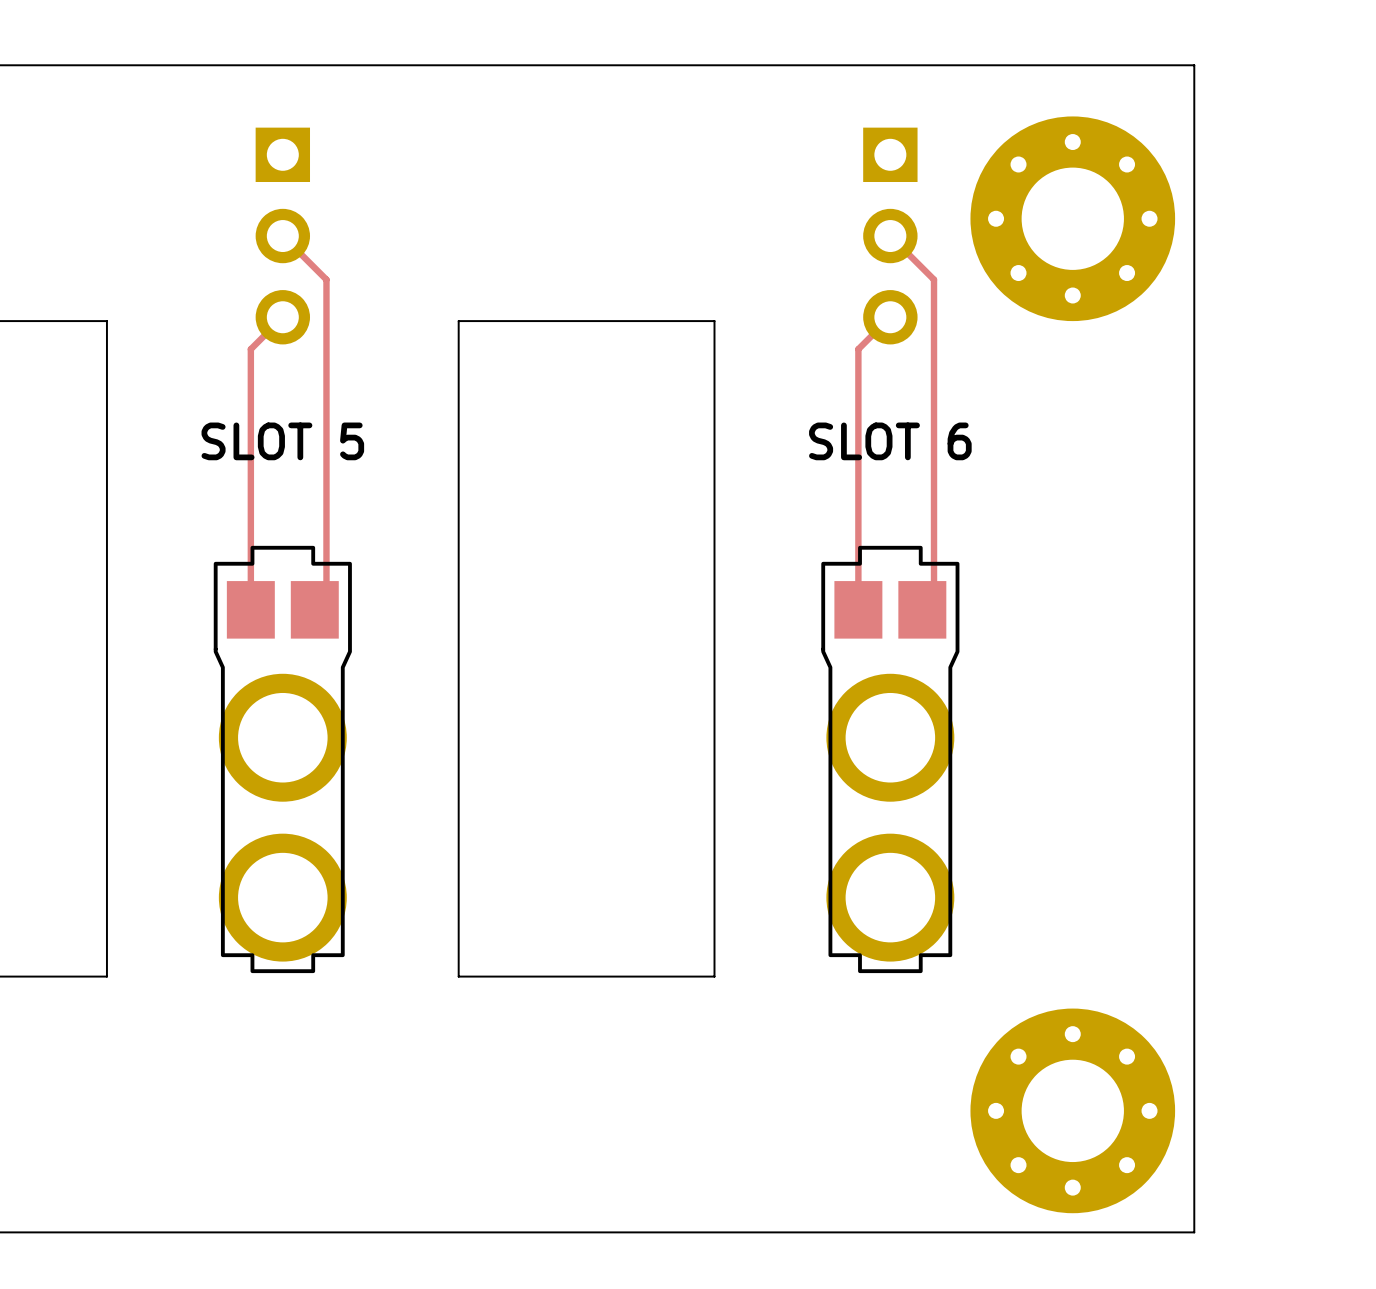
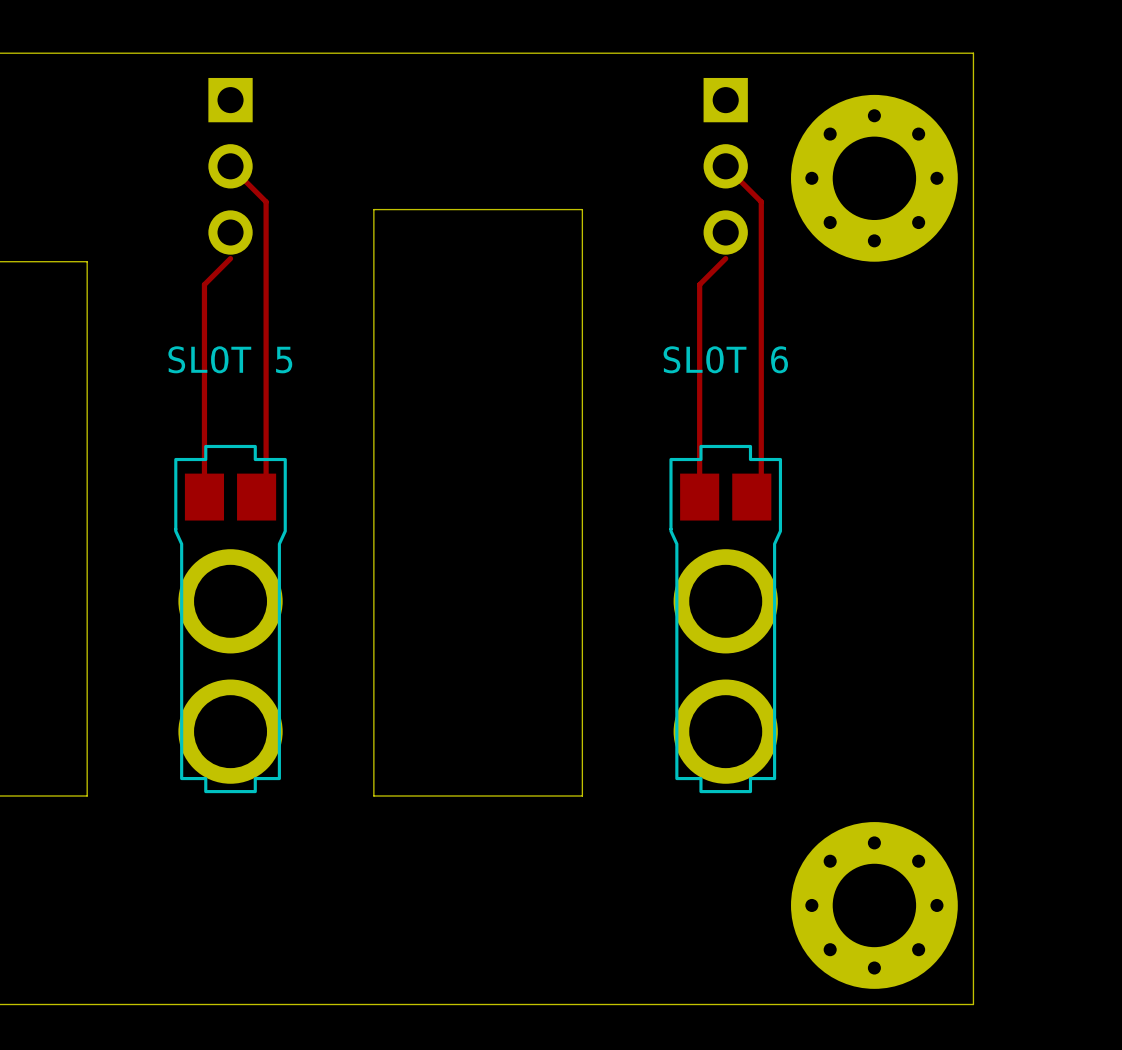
track: (282, 236) (326, 279) -> (230, 166) (266, 201) (266, 227)
part position: (282, 236) -> (230, 166)
track: (890, 236) (934, 279) -> (725, 166) (761, 201) (761, 227)
part position: (890, 236) -> (725, 166)
board edge: (458, 321) (714, 321) -> (373, 261) (373, 209) (582, 209) (582, 261)

